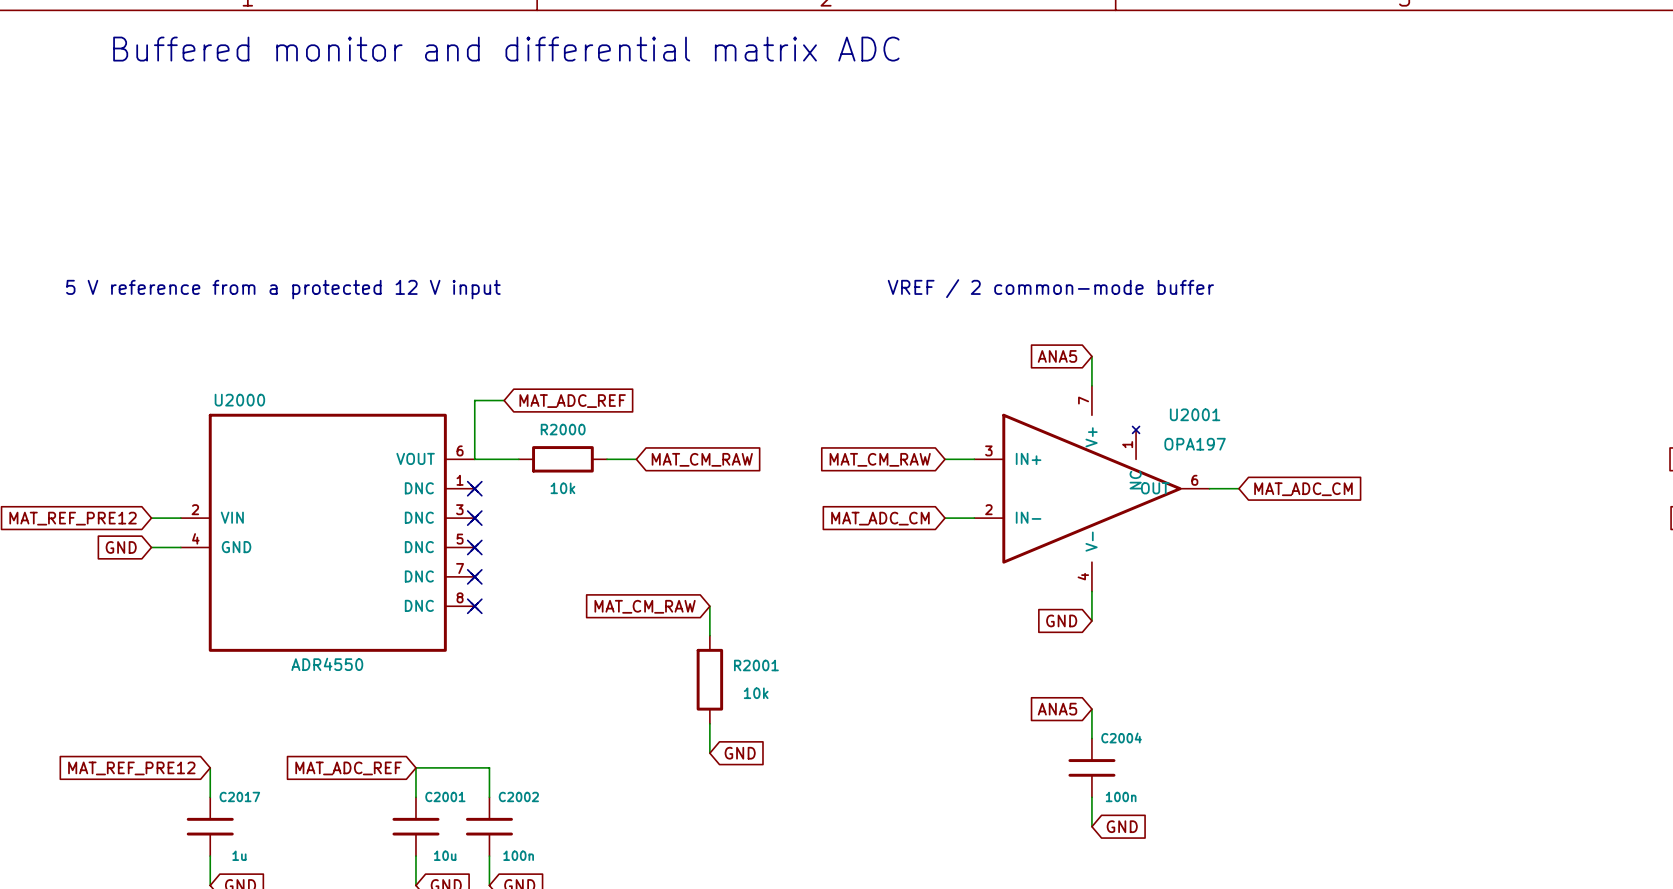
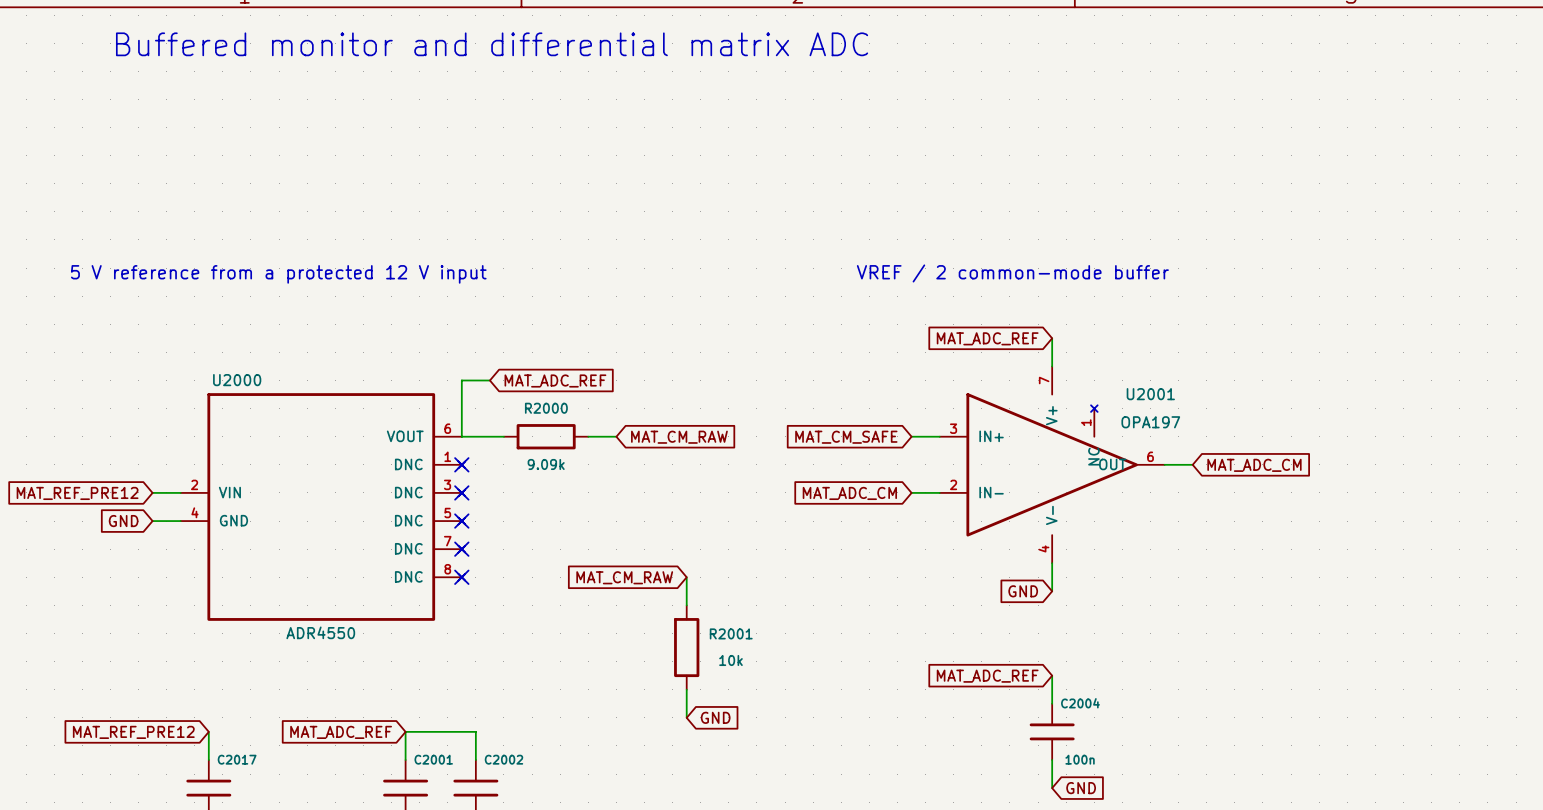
global label: ANA5 (1057, 356) -> MAT_ADC_REF (987, 338)
global label: MAT_CM_RAW (880, 459) -> MAT_CM_SAFE (846, 437)
R2000 value: 10k (562, 488) -> 9.09k (546, 464)
global label: ANA5 (1057, 709) -> MAT_ADC_REF (987, 676)

